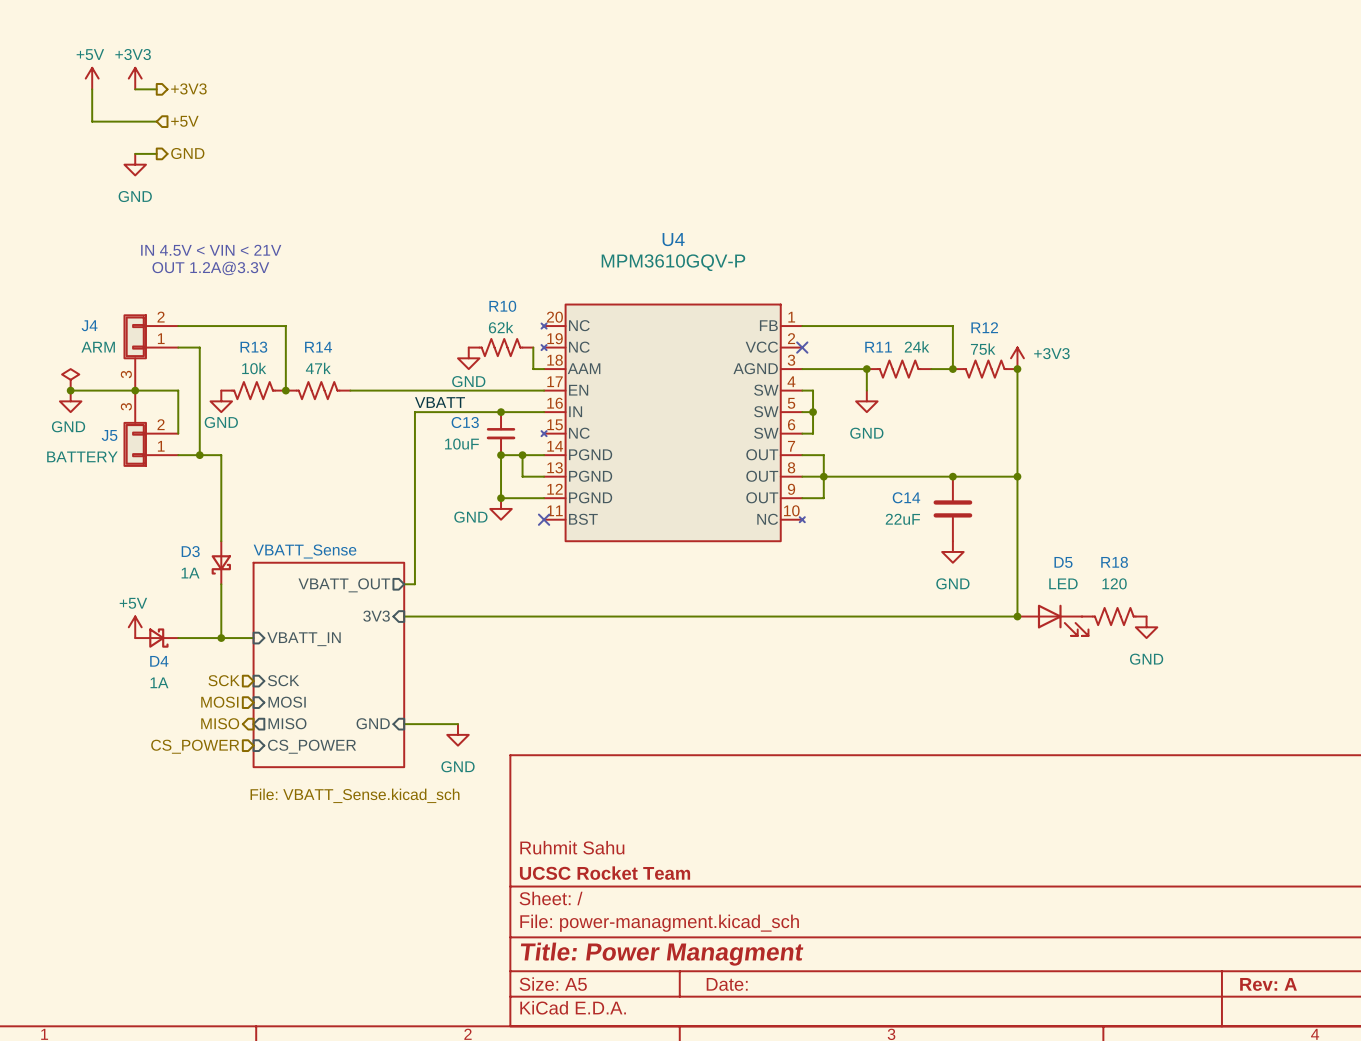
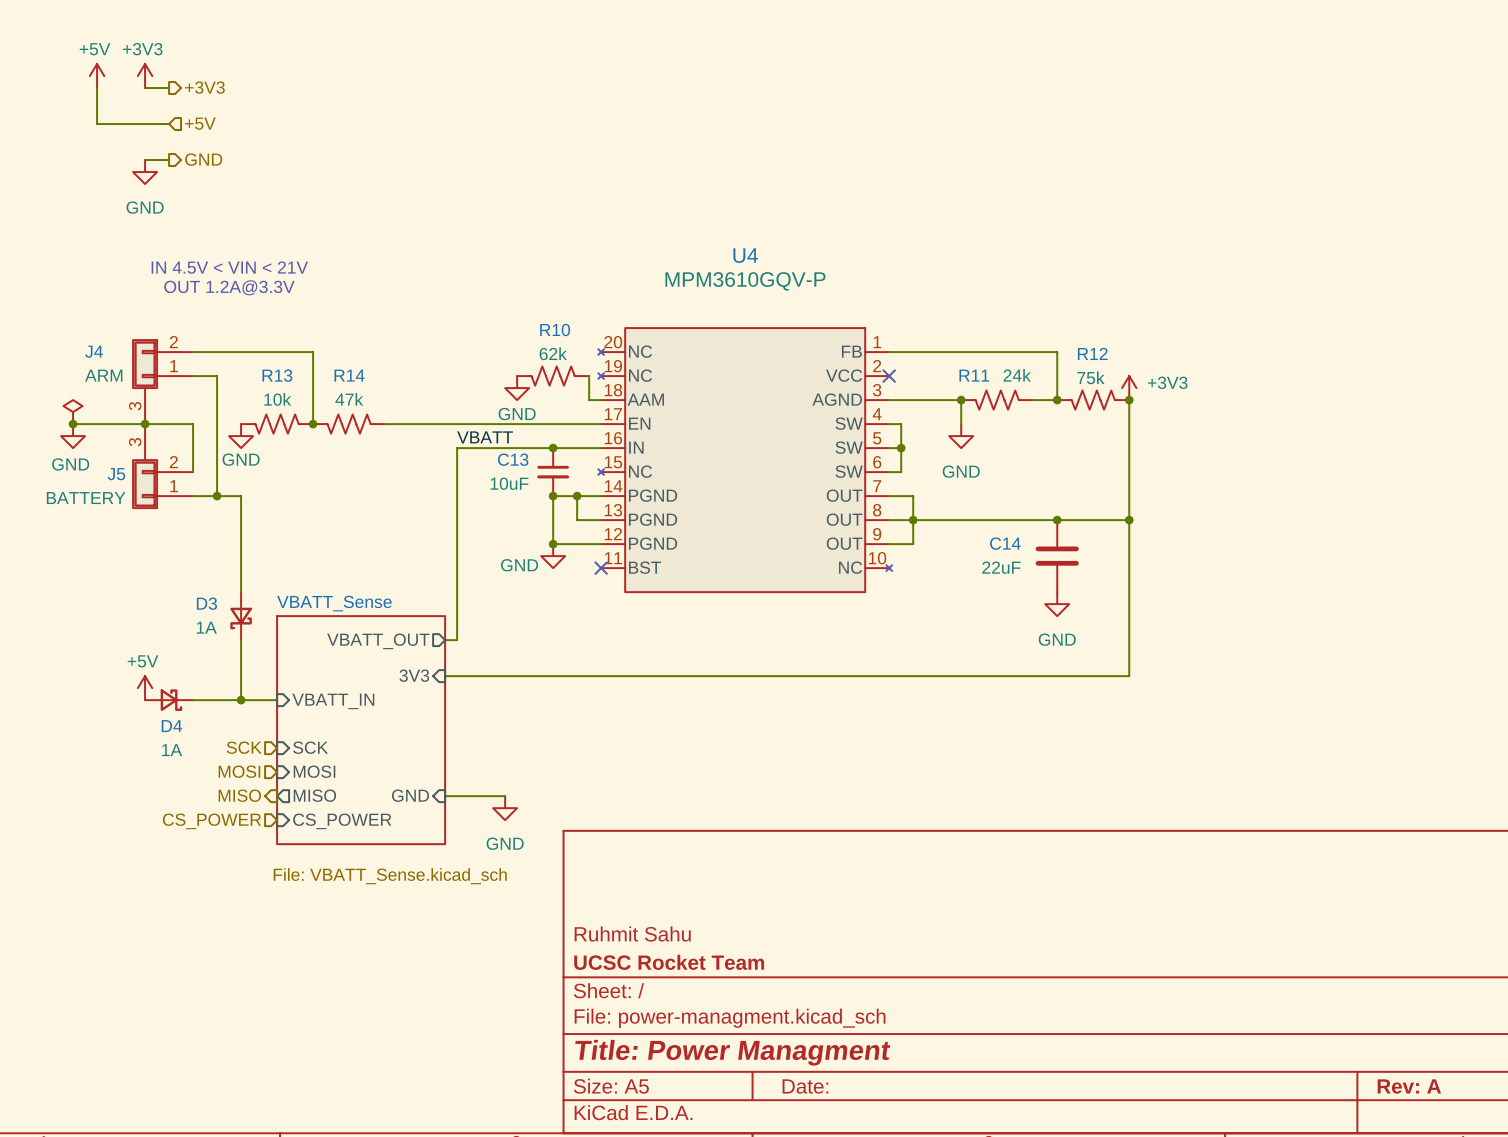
junction: (1017, 616) -> none
R18: 120 (1114, 616) -> none
D5: LED (1052, 620) -> none
power symbol: GND (1146, 627) -> none

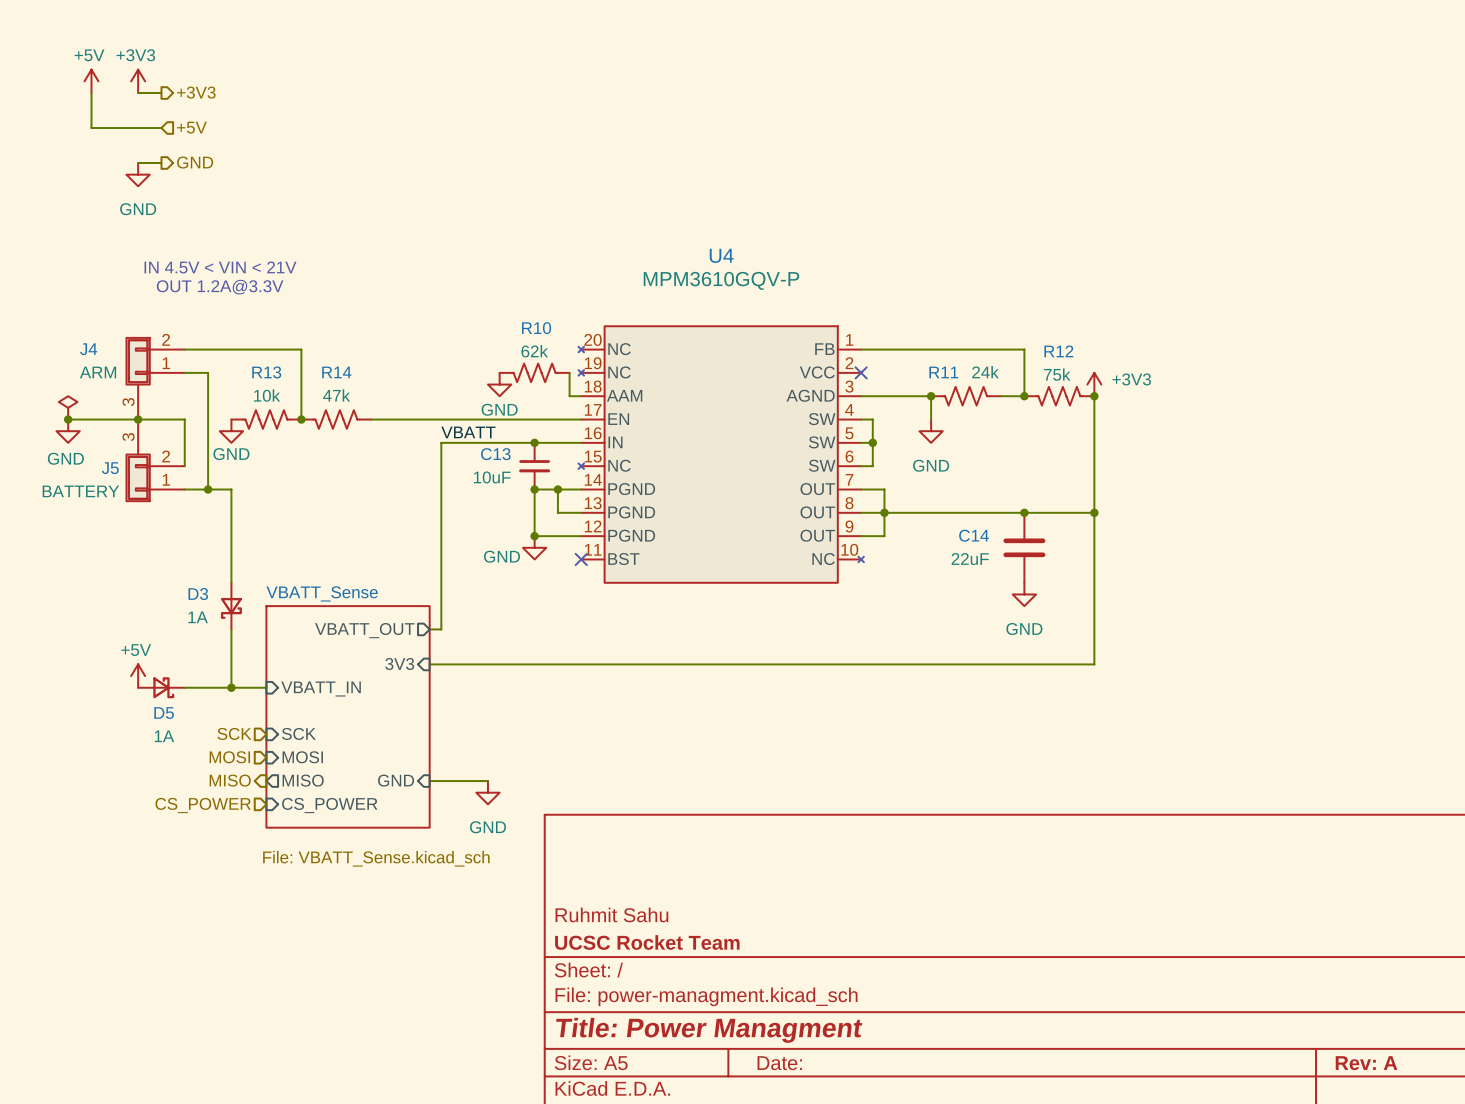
D4 name: D4 (171, 726) -> D5 (164, 713)

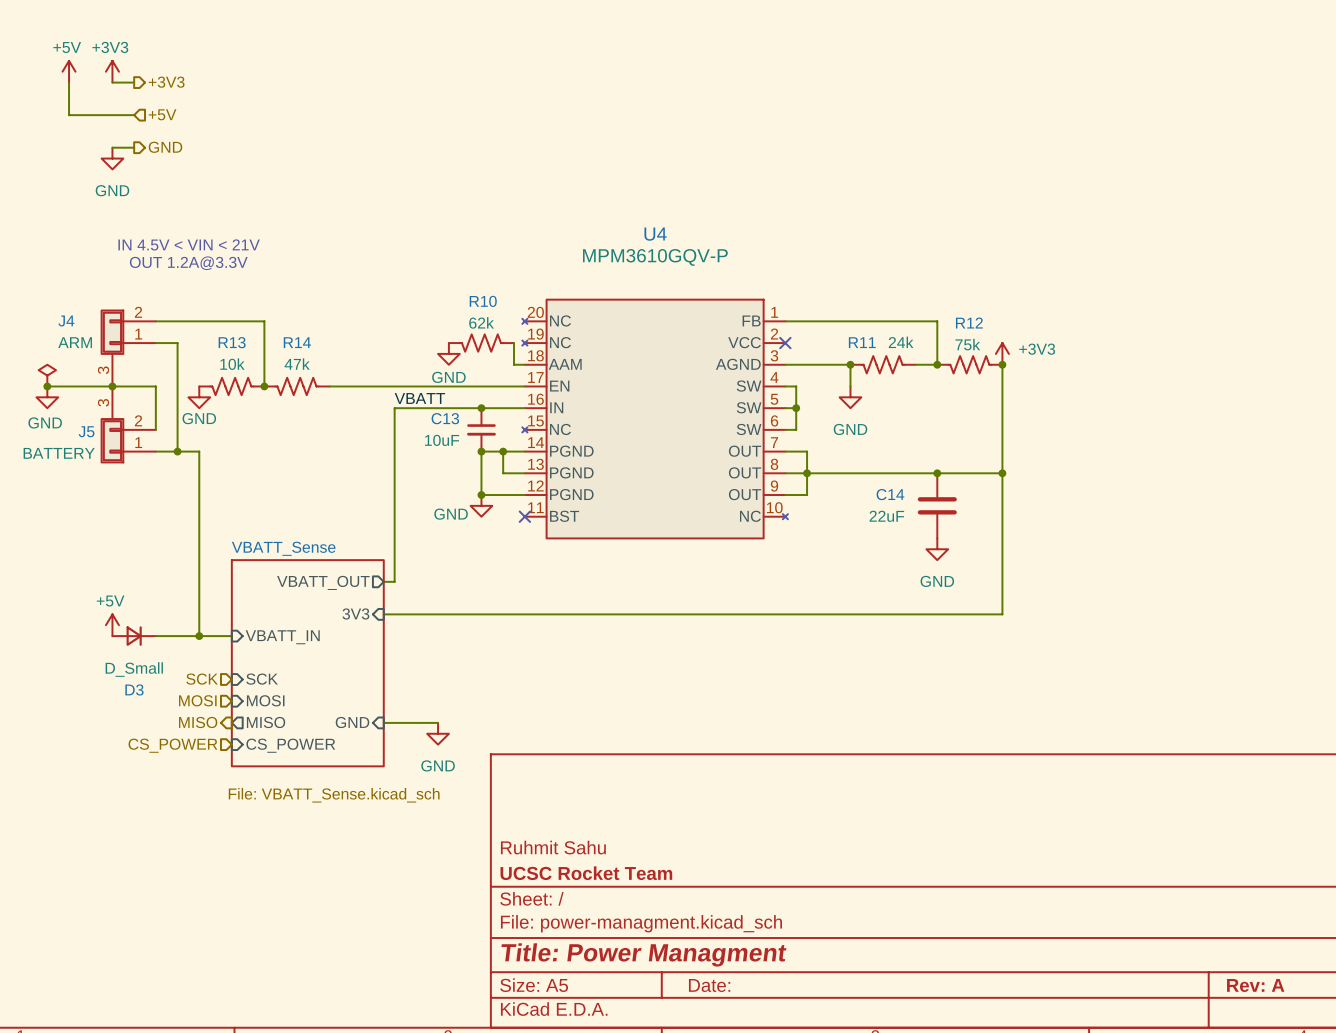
D3 symbol: [220, 582, 242, 630] -> [112, 626, 156, 646]
D3 name position: D3 (198, 594) -> D3 (134, 689)
D3 value: 1A (198, 617) -> D_Small (134, 669)
D5: 1A (161, 687) -> none

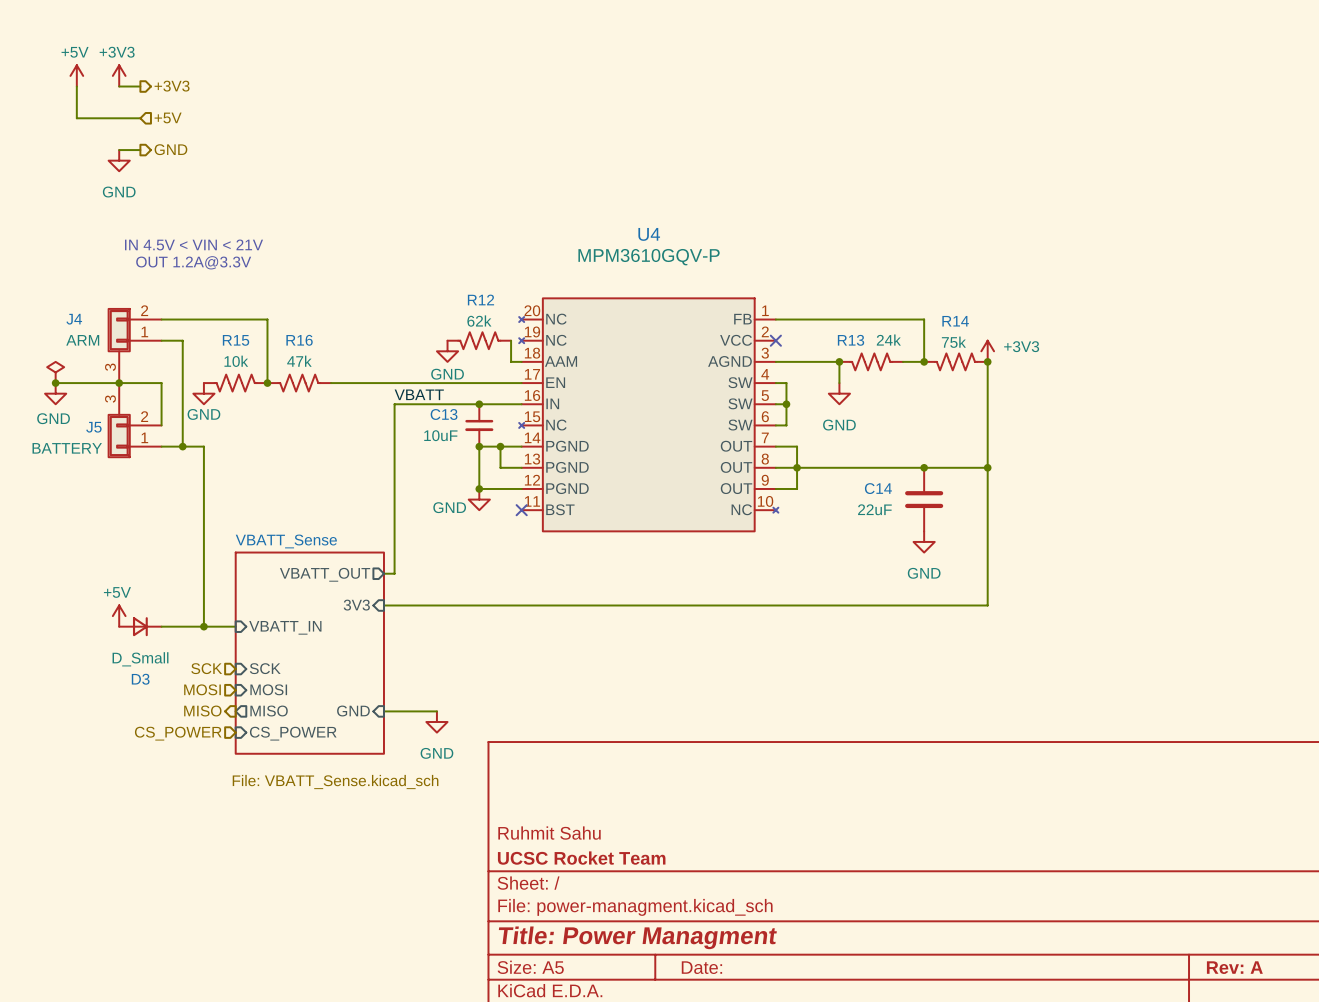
R10 name: R10 (483, 301) -> R12 (480, 299)
R12 name: R12 (969, 323) -> R14 (955, 321)
R13 name: R13 (232, 342) -> R15 (236, 340)
R14 name: R14 (297, 342) -> R16 (299, 340)
R11 name: R11 (862, 342) -> R13 (851, 340)

